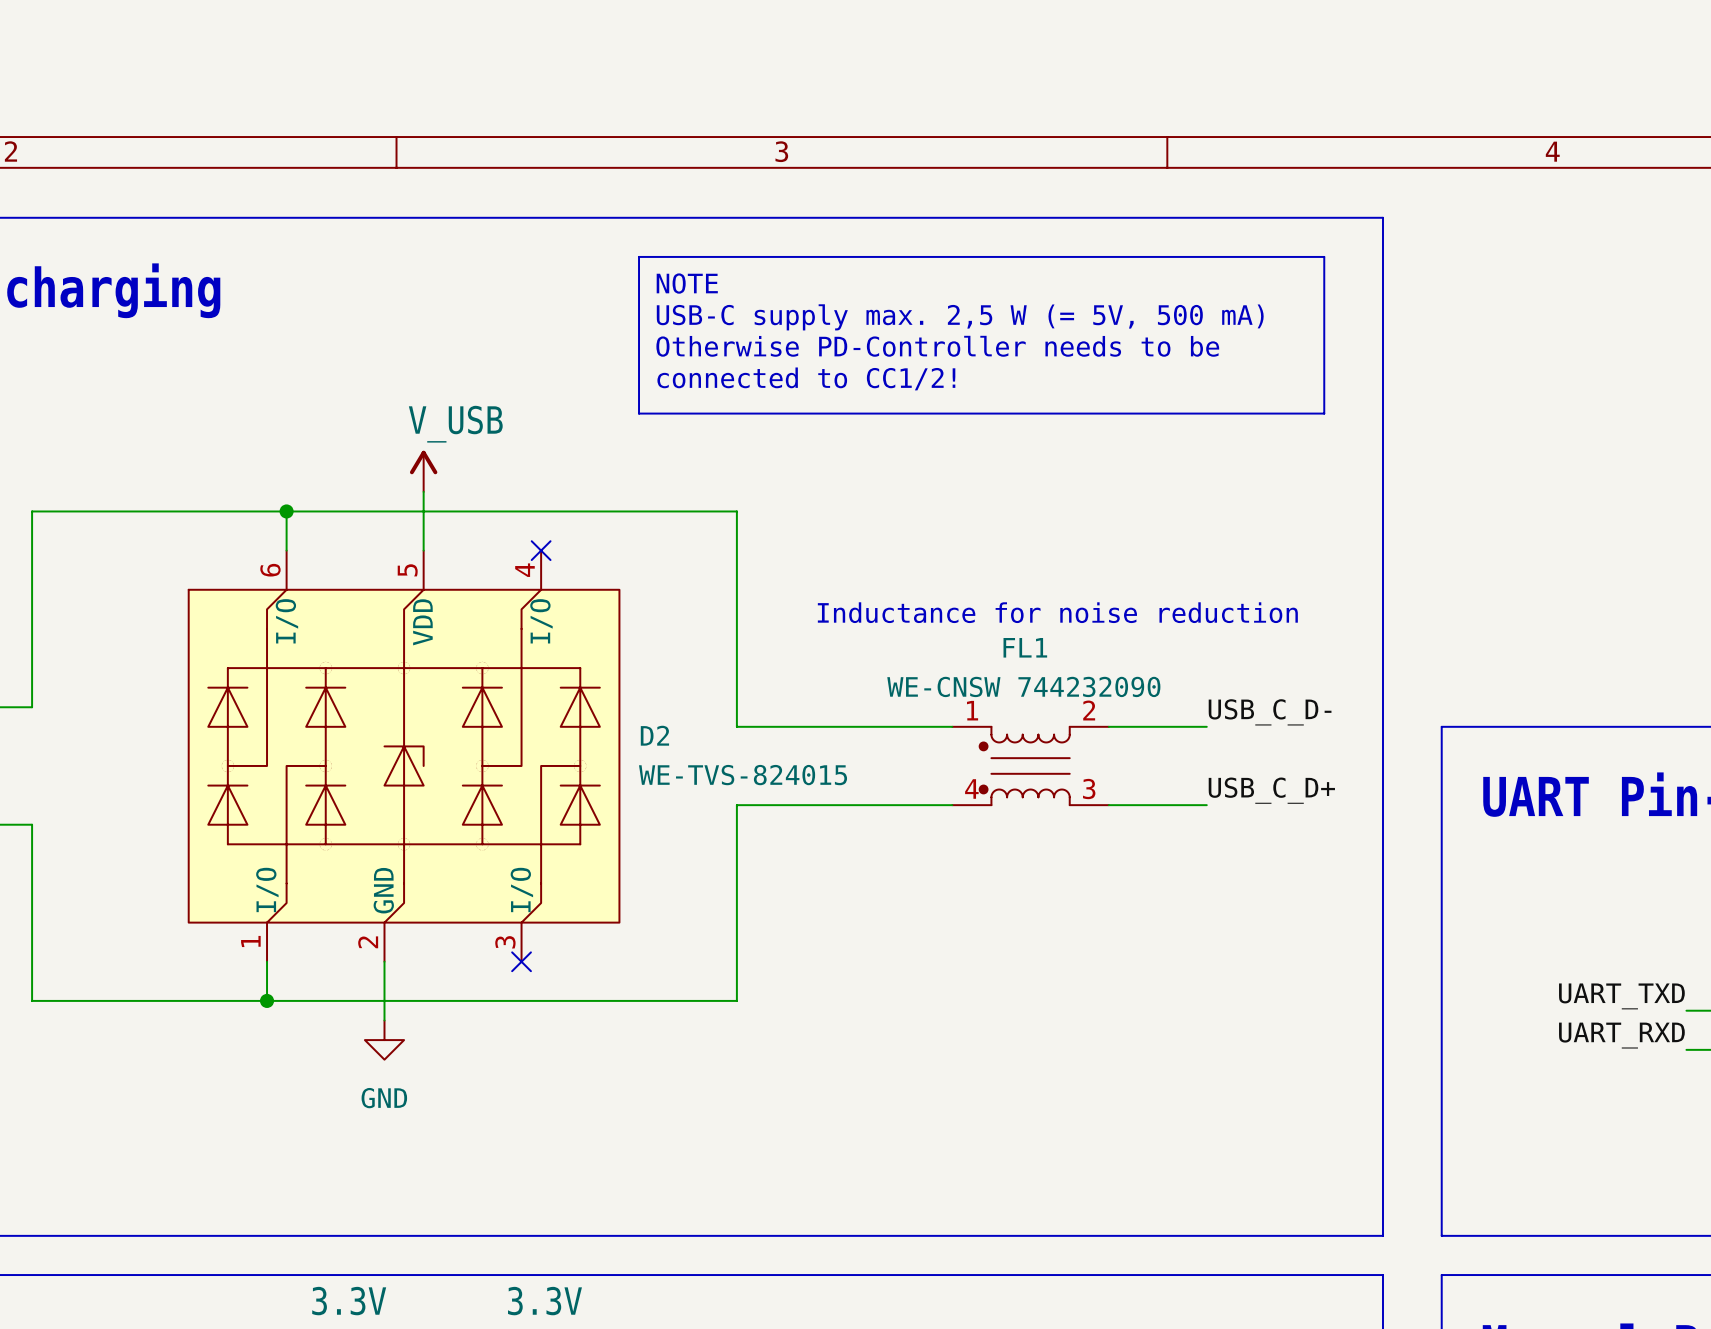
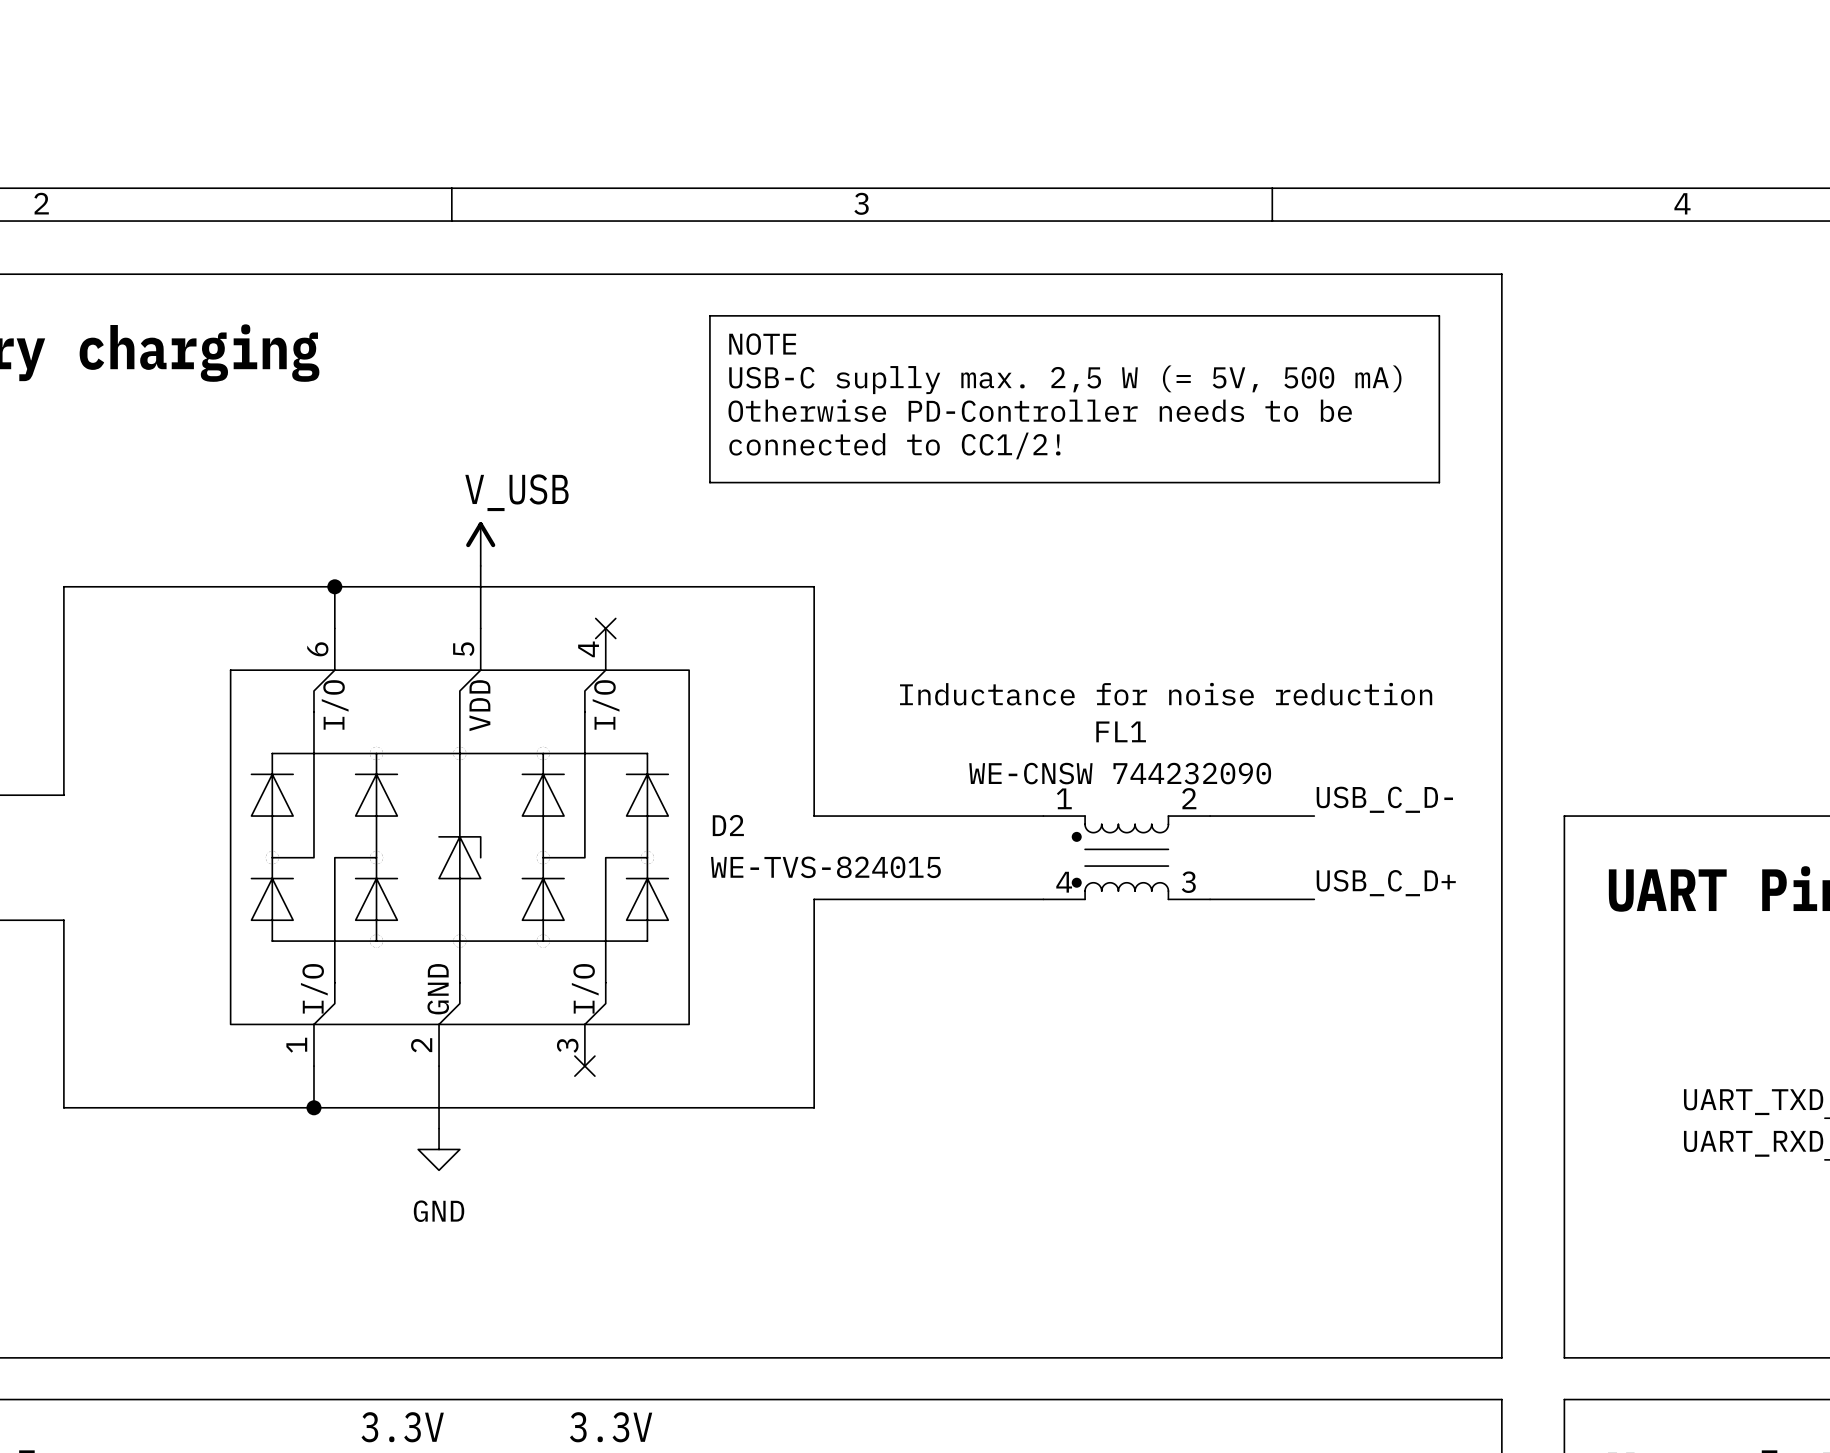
text: USB-C supply max. 2,5 W (= 5V, 500 mA) (960, 317) -> USB-C suplly max. 2,5 W (= 5V, 500 mA) (1065, 379)

